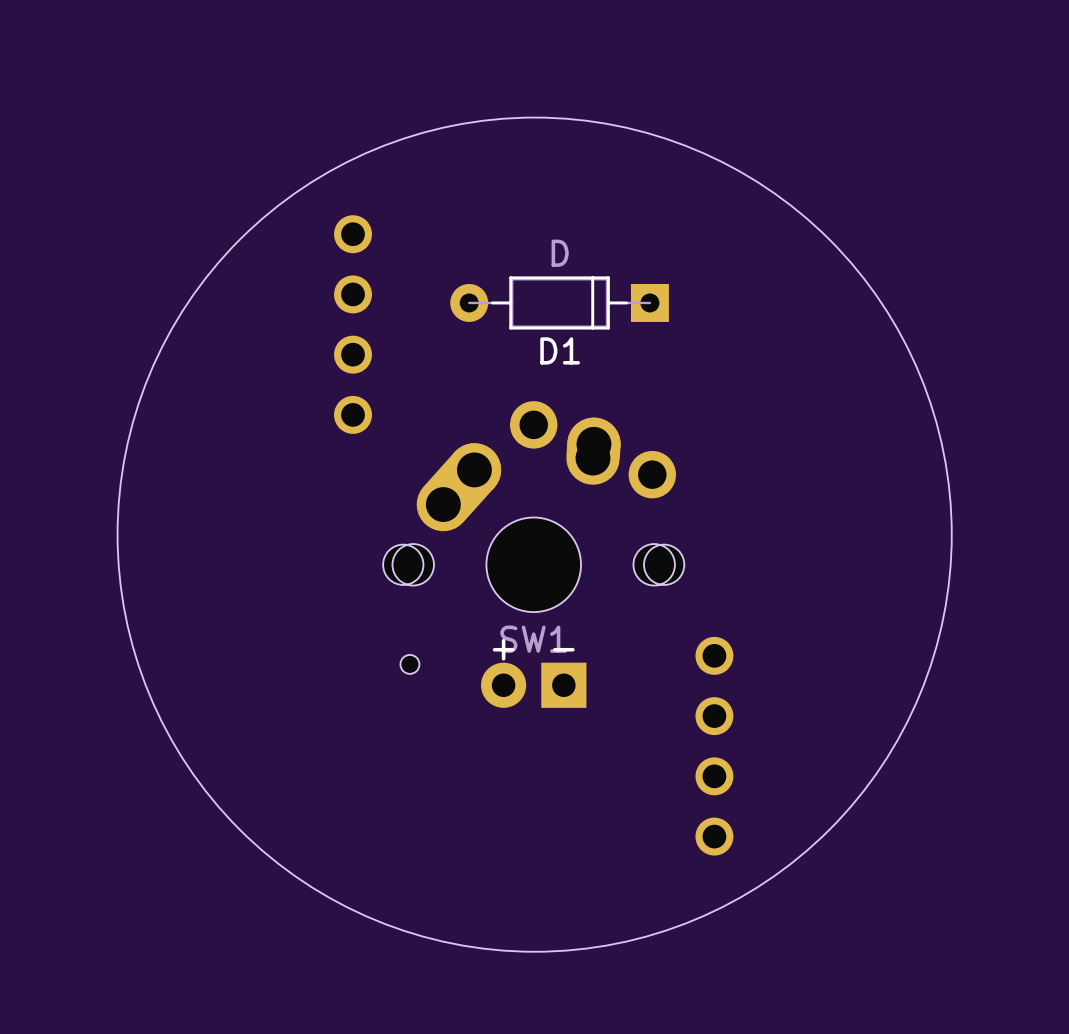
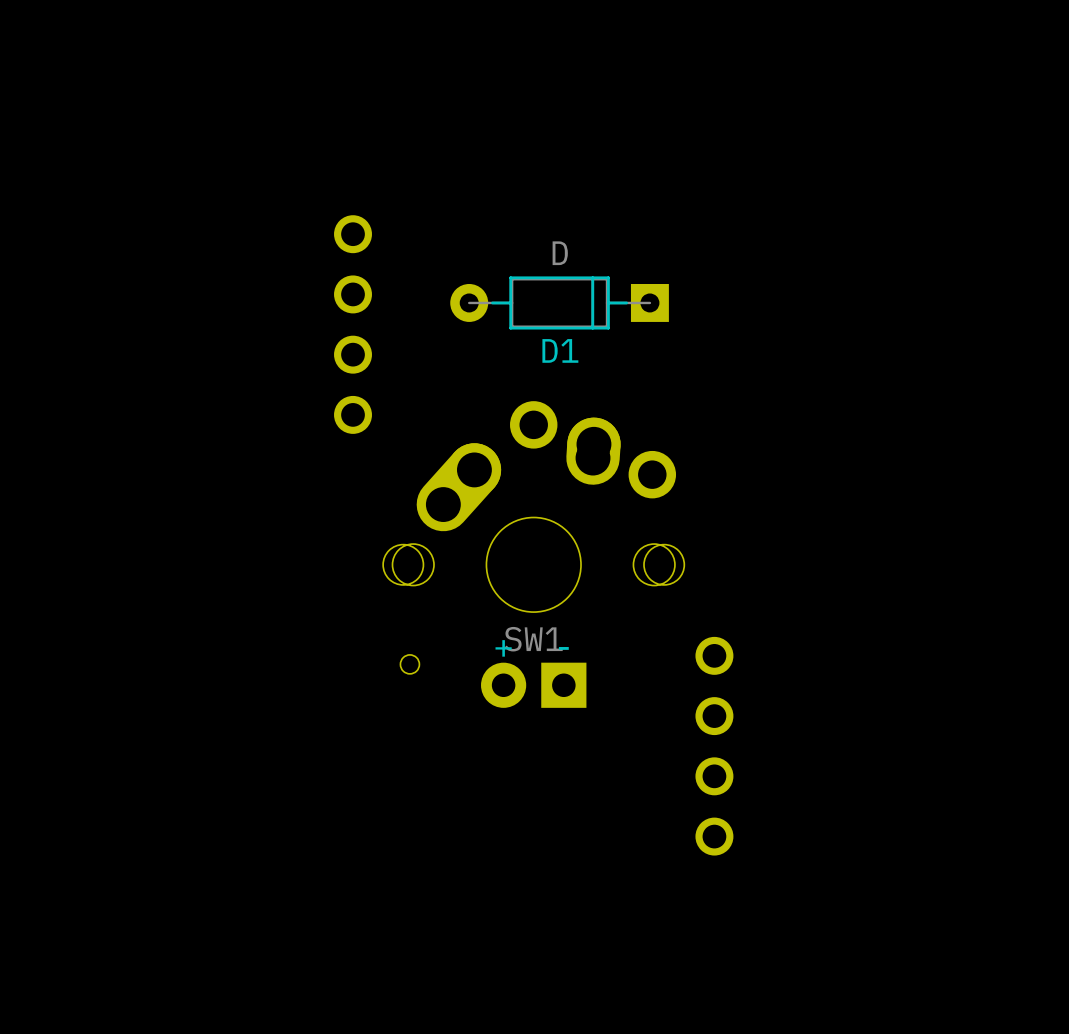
round board edge: [116, 116, 953, 953] -> none

